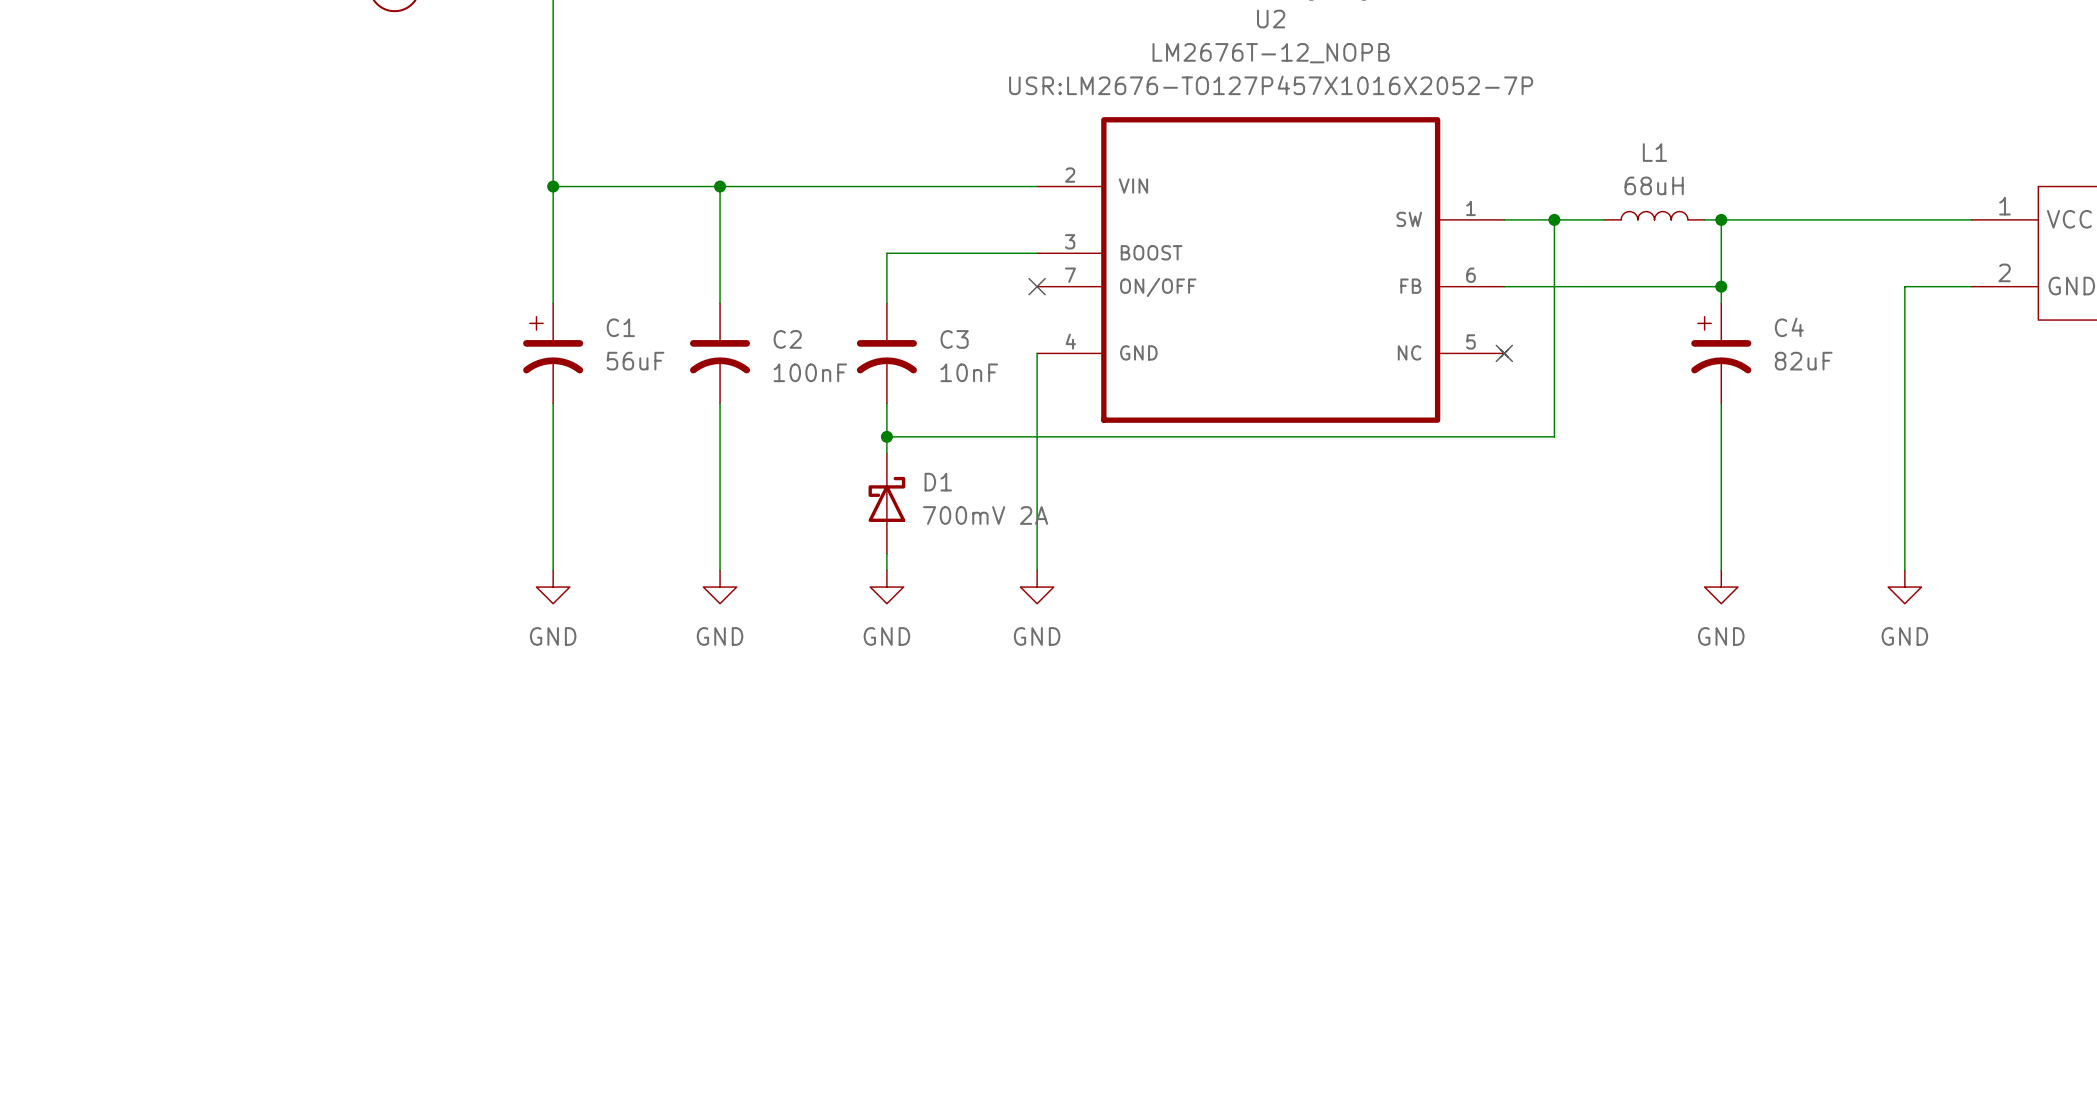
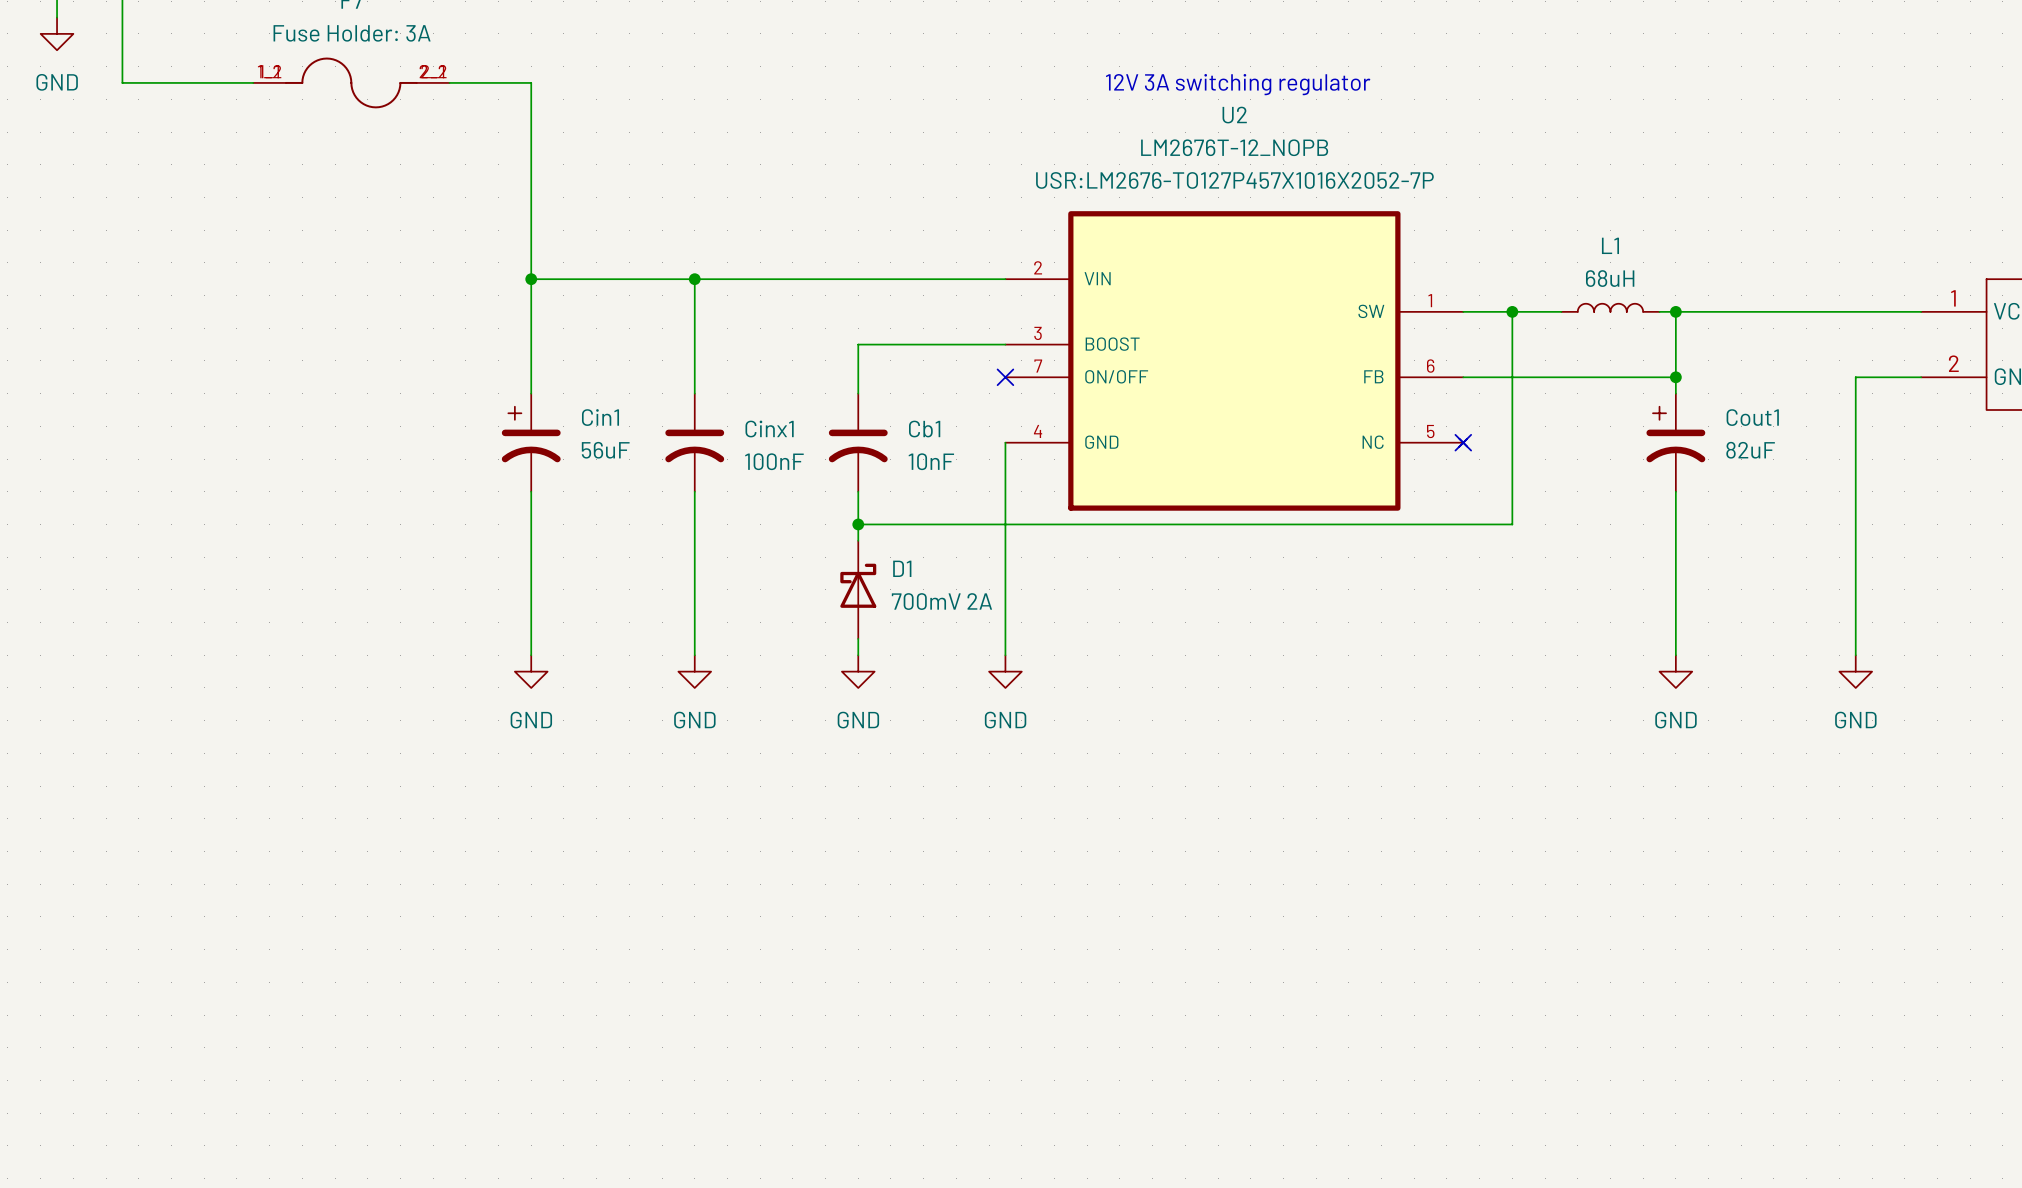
C1 name: C1 (620, 327) -> Cin1 (600, 417)
C4 name: C4 (1789, 327) -> Cout1 (1752, 417)
C2 name: C2 (787, 339) -> Cinx1 (769, 428)
C3 name: C3 (954, 339) -> Cb1 (924, 429)

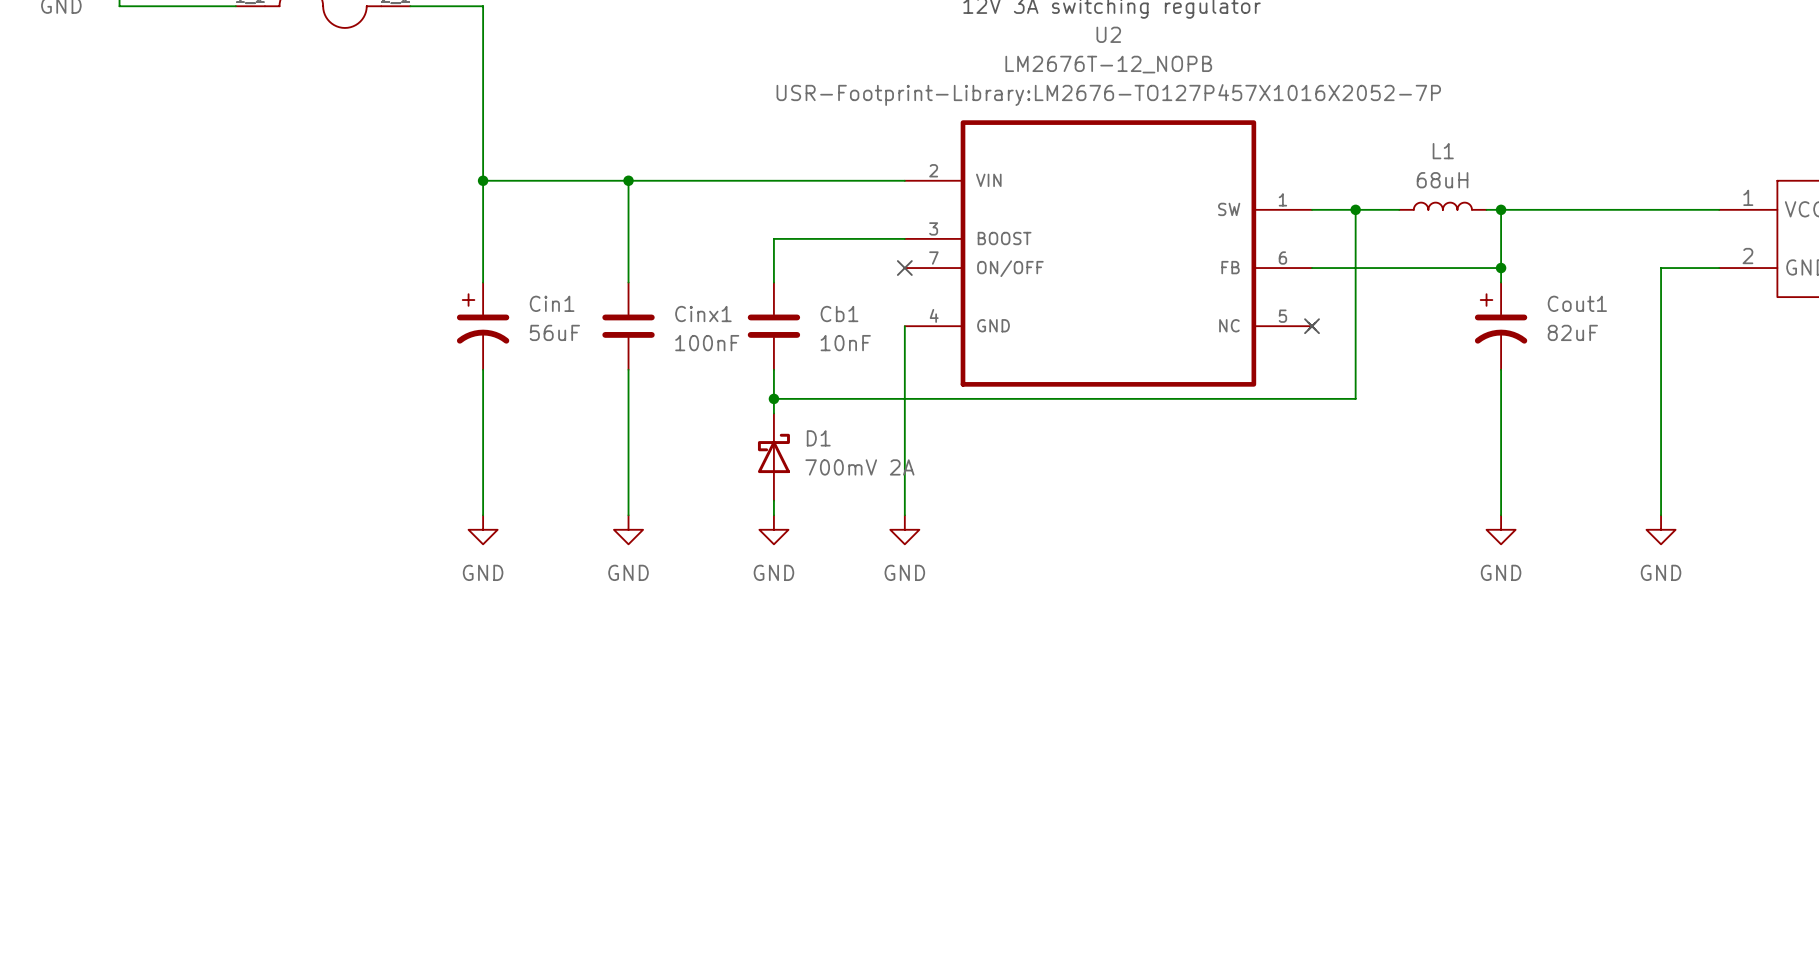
U2 text: USR:LM2676-TO127P457X1016X2052-7P (1234, 180) -> USR-Footprint-Library:LM2676-TO127P457X1016X2052-7P (1108, 95)
Cinx1 symbol: [665, 393, 725, 492] -> [602, 282, 655, 370]
Cb1 symbol: [828, 393, 888, 492] -> [747, 282, 801, 370]

